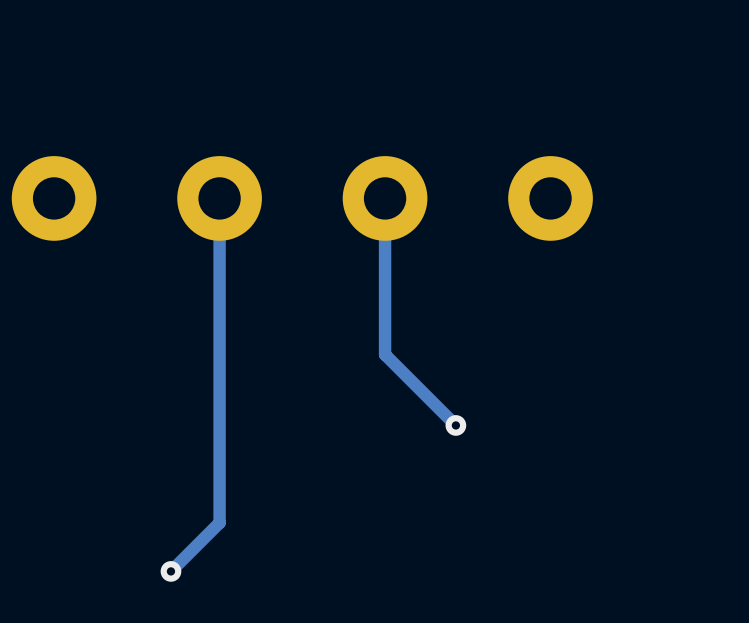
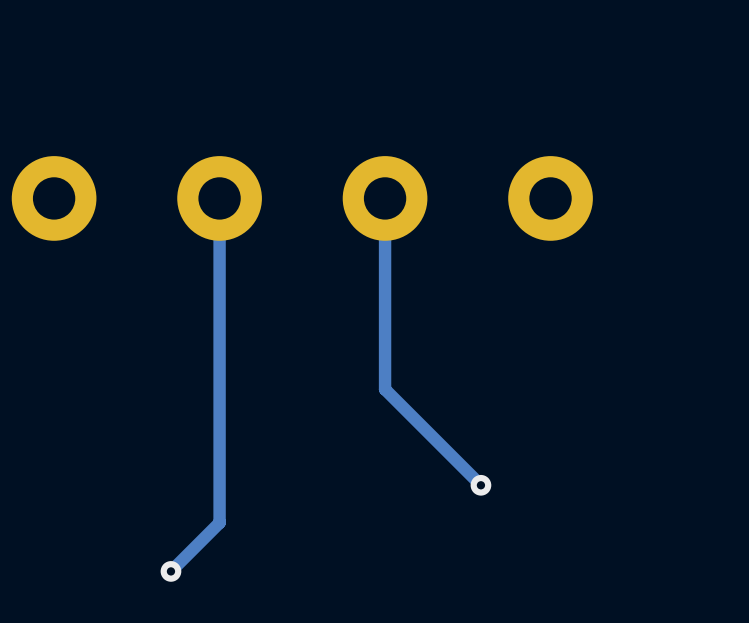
track: (385, 354) (455, 425) -> (385, 354) (385, 389) (480, 485)
via position: (455, 425) -> (480, 485)

